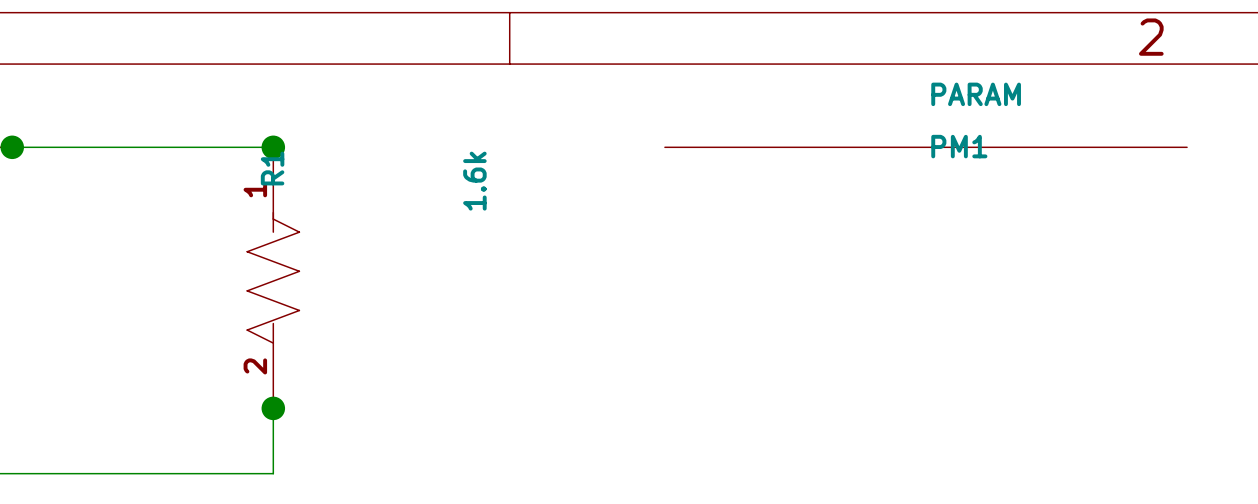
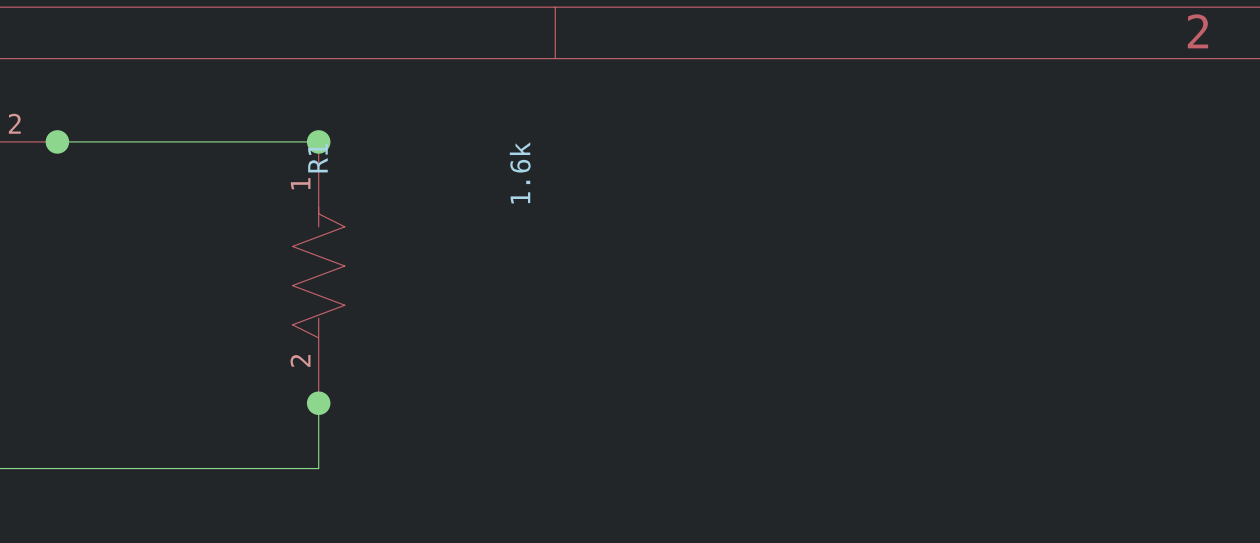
PM1: PARAM (925, 147) -> none

